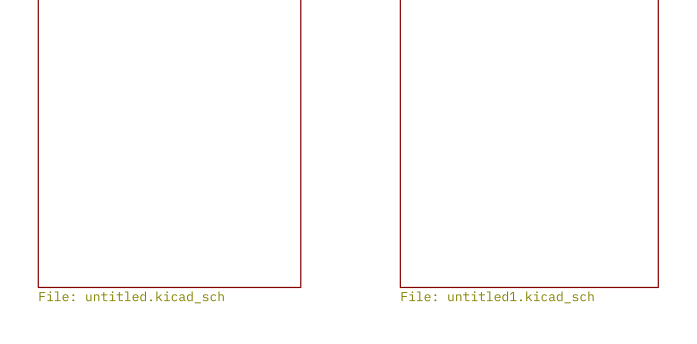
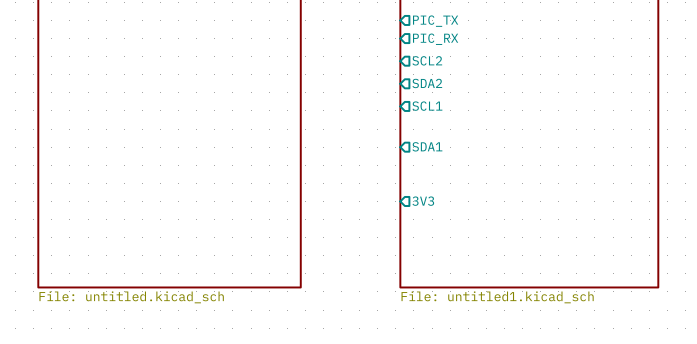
sheet pin: none -> PIC_TX (435, 21)
sheet pin: none -> PIC_RX (435, 39)
sheet pin: none -> SCL2 (427, 60)
sheet pin: none -> SDA2 (427, 83)
sheet pin: none -> SCL1 (427, 106)
sheet pin: none -> SDA1 (427, 146)
sheet pin: none -> 3V3 (423, 201)

